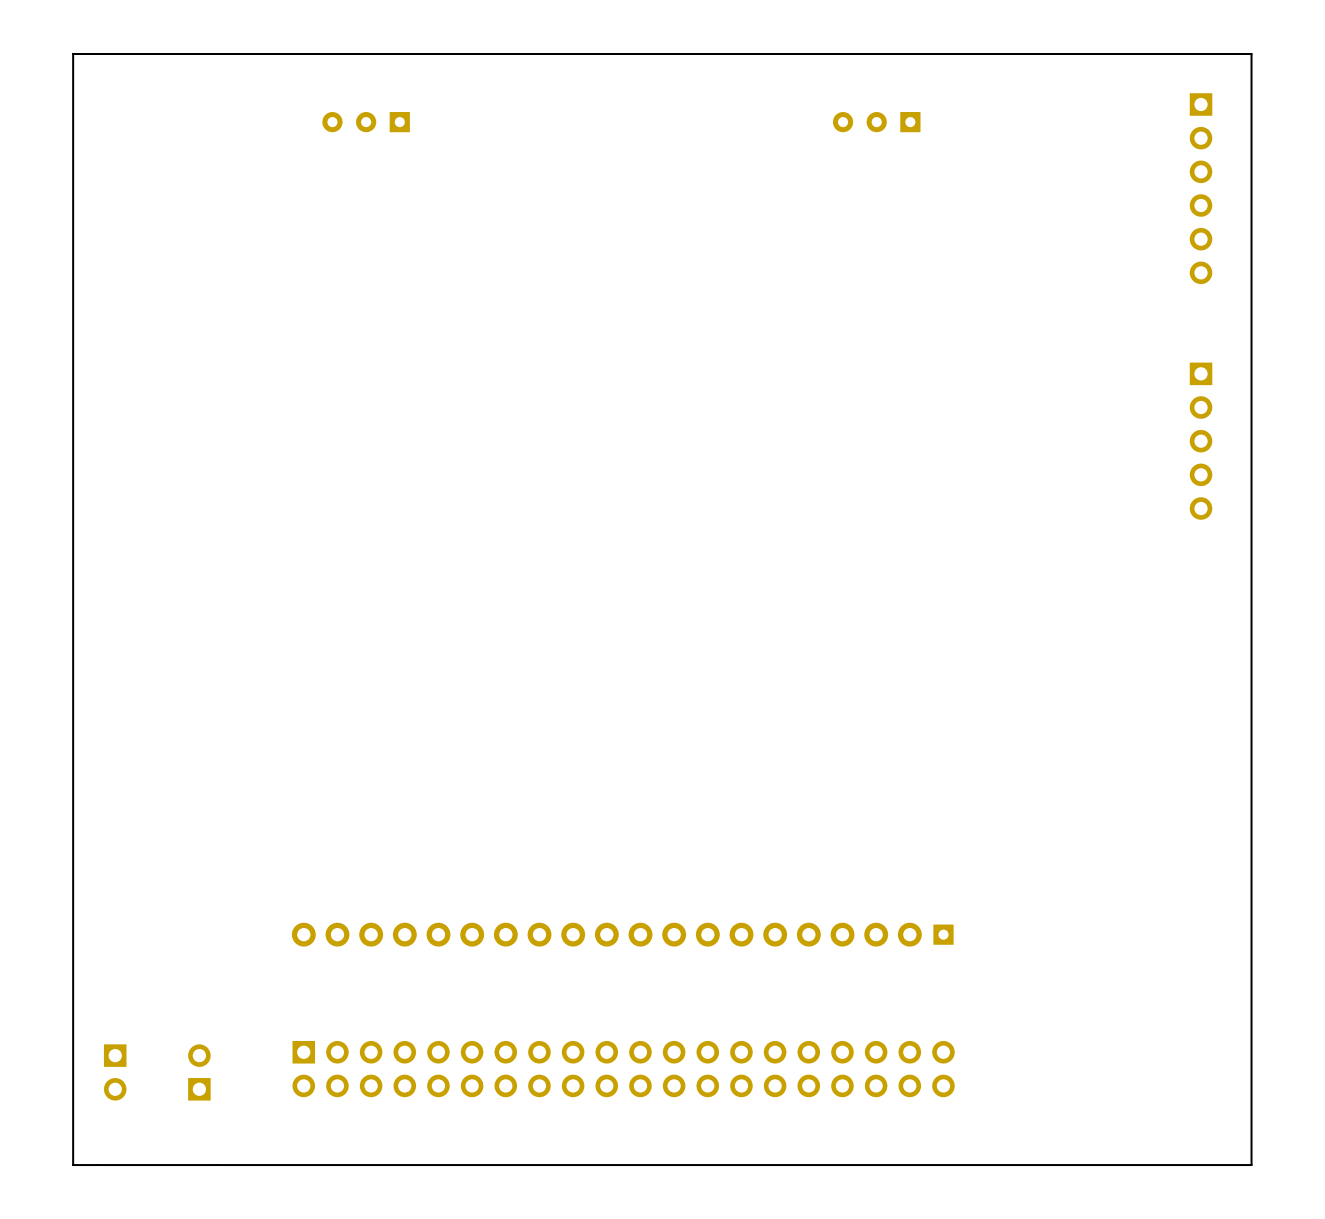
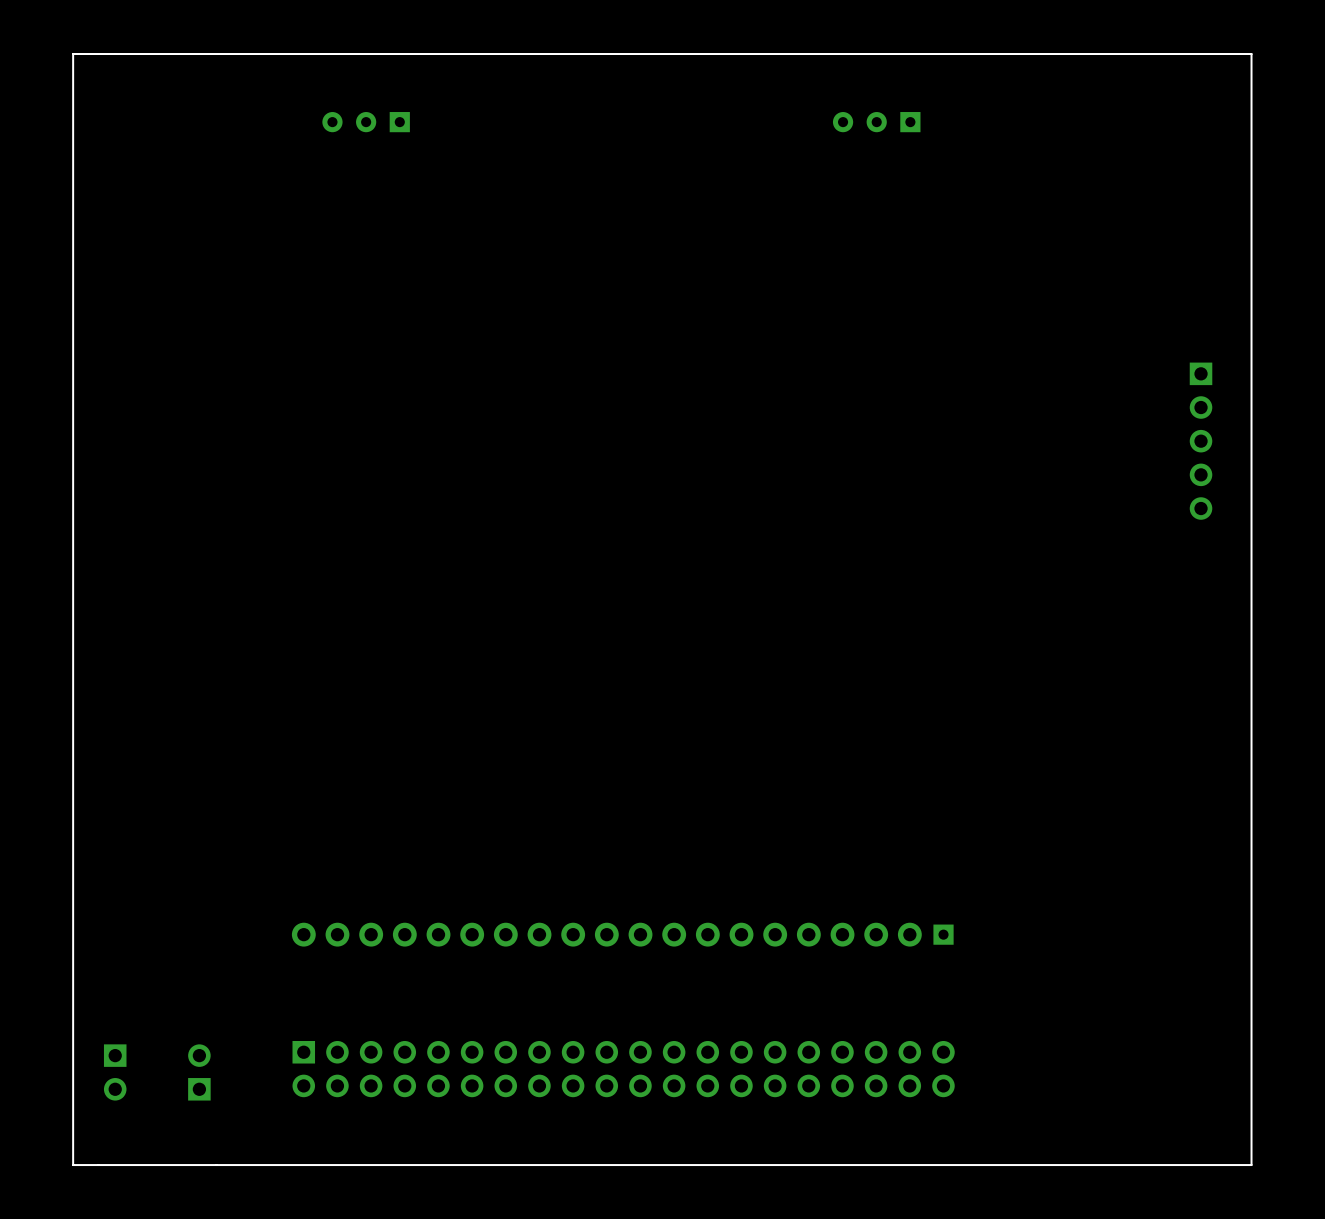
part: (1201, 188) -> none

